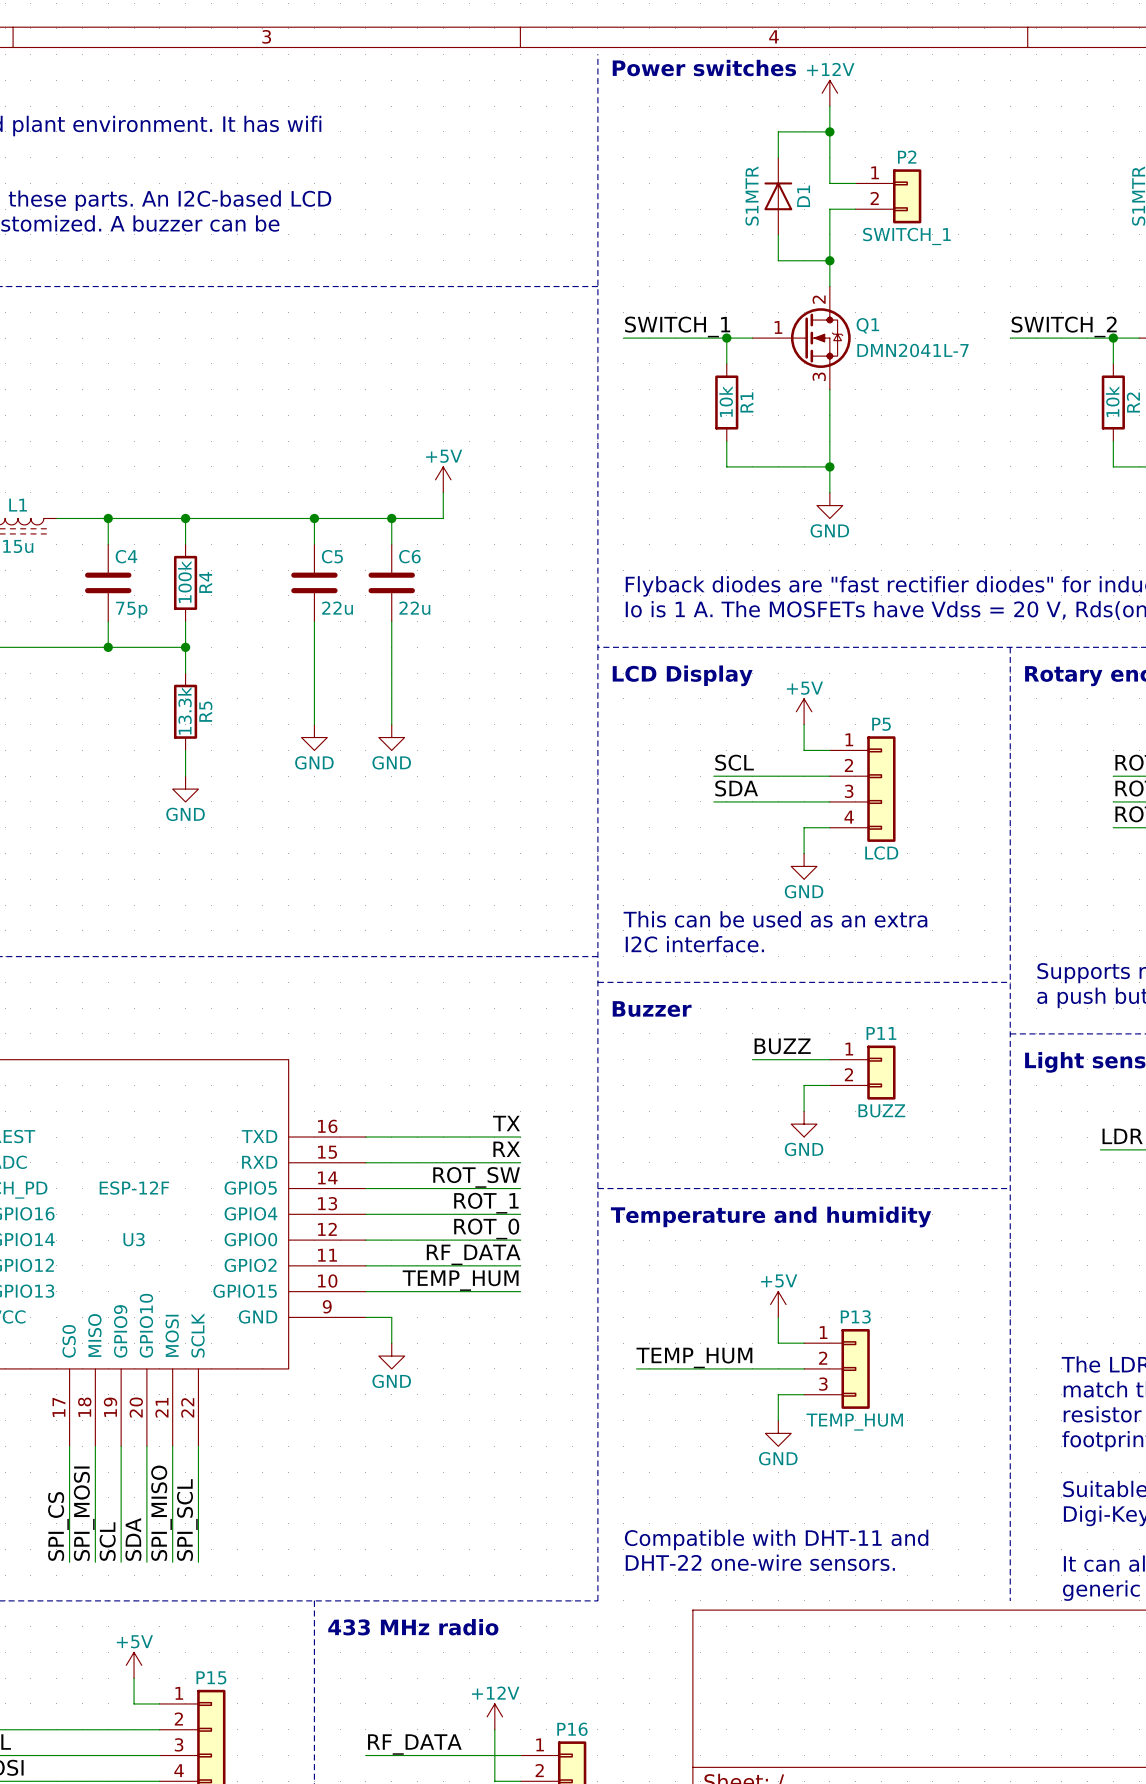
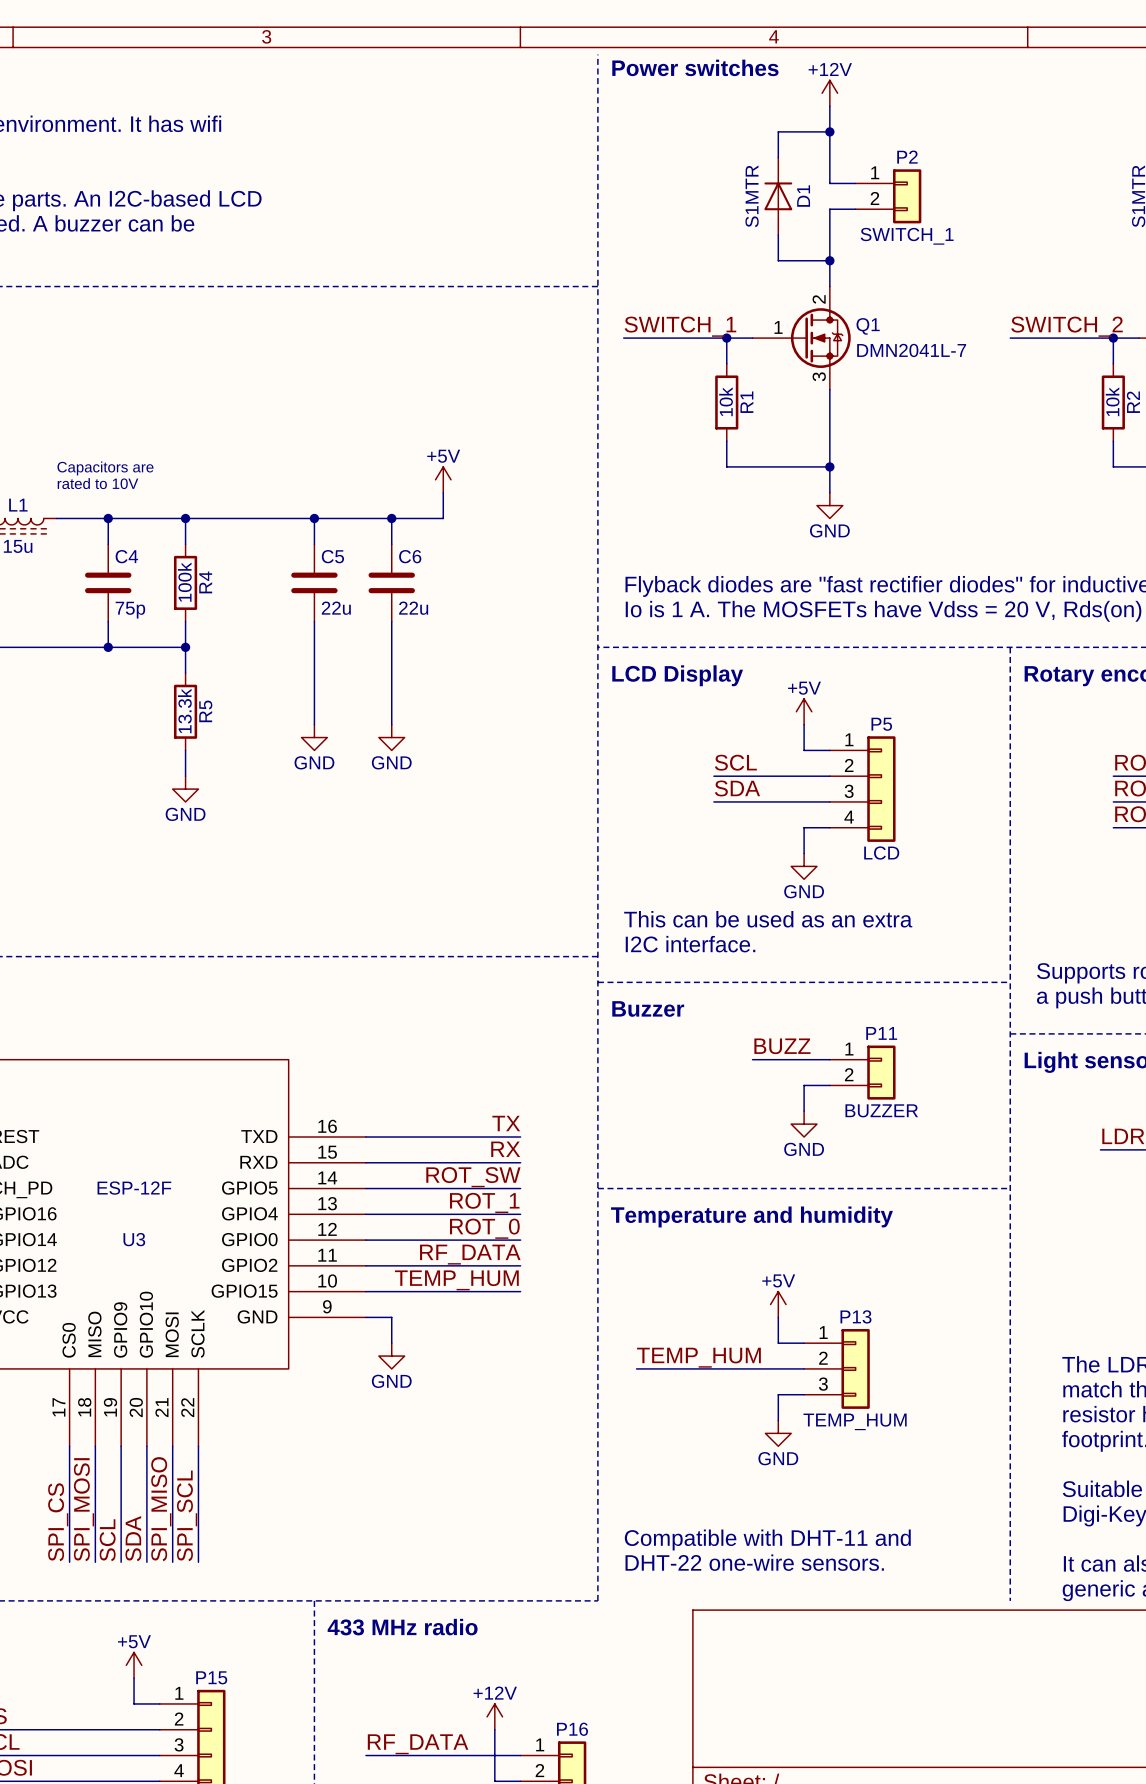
text: none -> Capacitors are (105, 468)
text: none -> rated to 10V (97, 483)
P11 value: BUZZ (881, 1110) -> BUZZER (881, 1110)

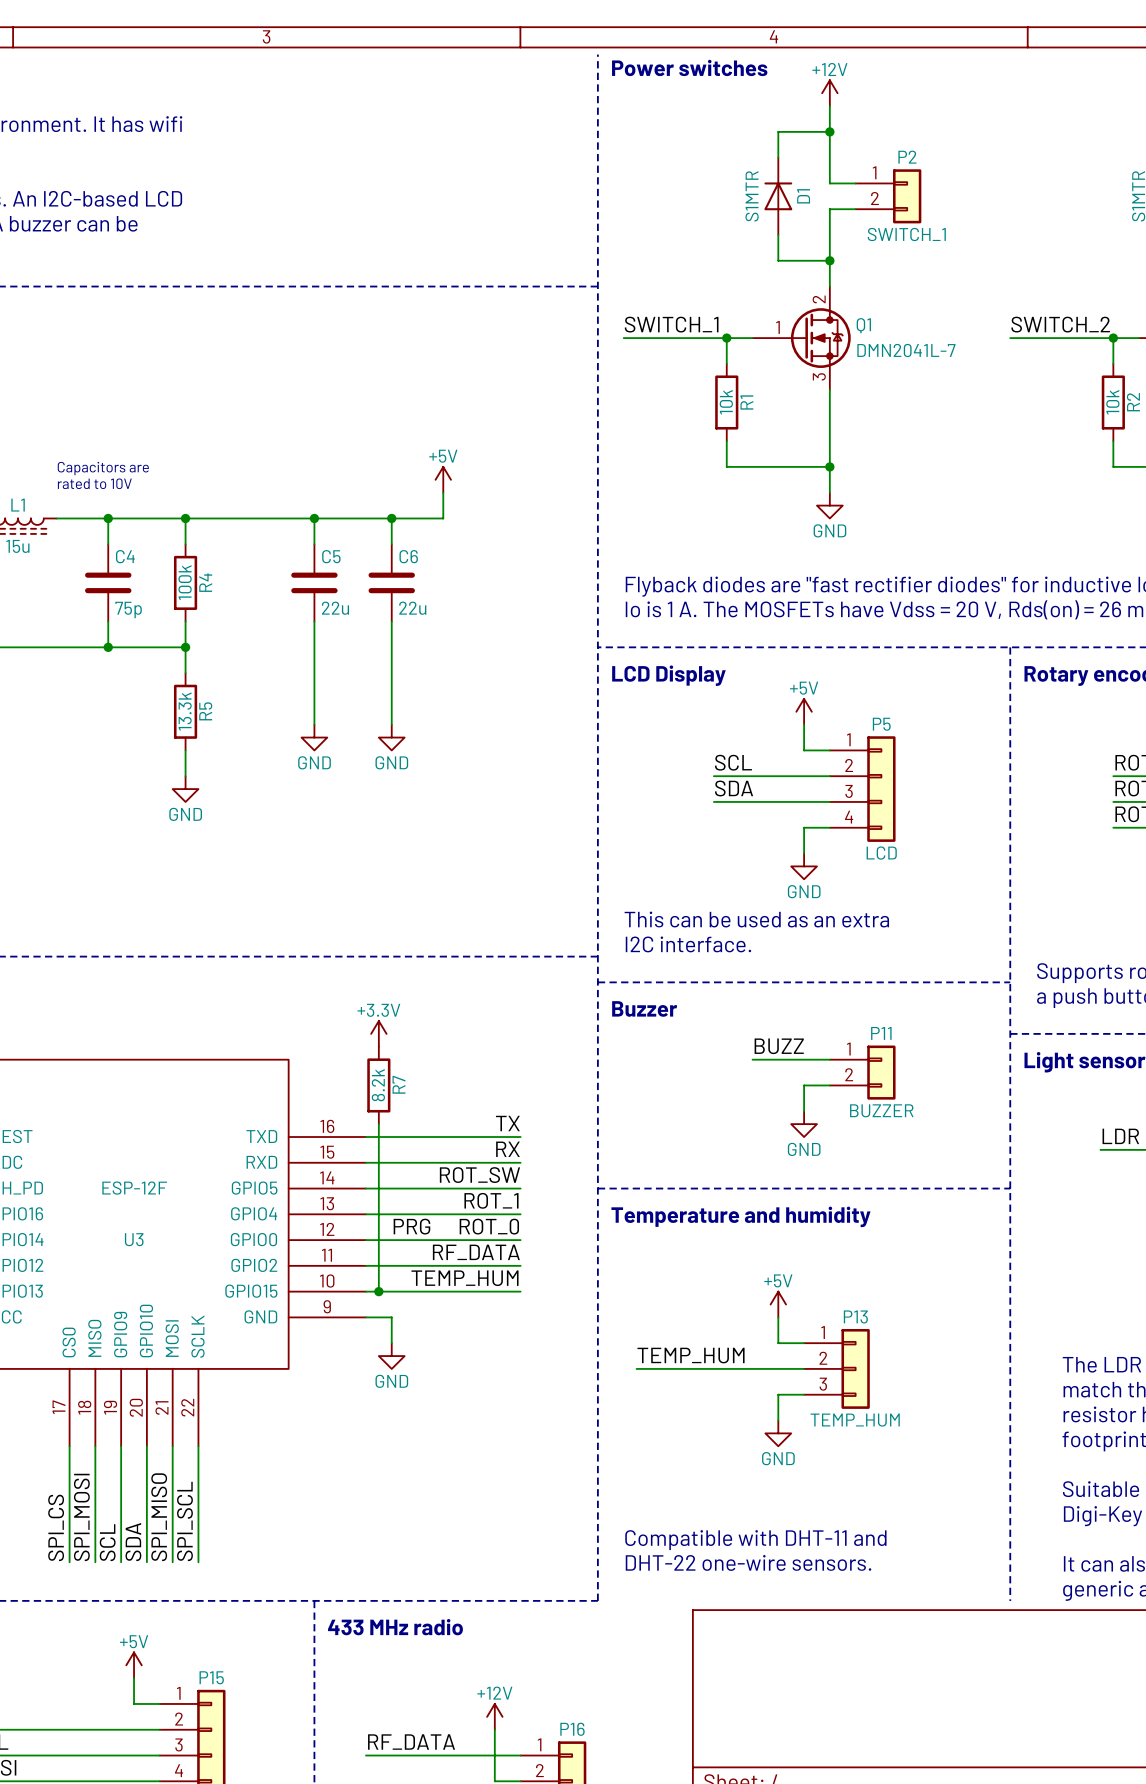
power symbol: none -> +3.3V (378, 1033)
R7: none -> 8.2k (378, 1085)
wire: none -> (378, 1124) (378, 1291)
label: none -> PRG (411, 1226)
junction: none -> (378, 1291)

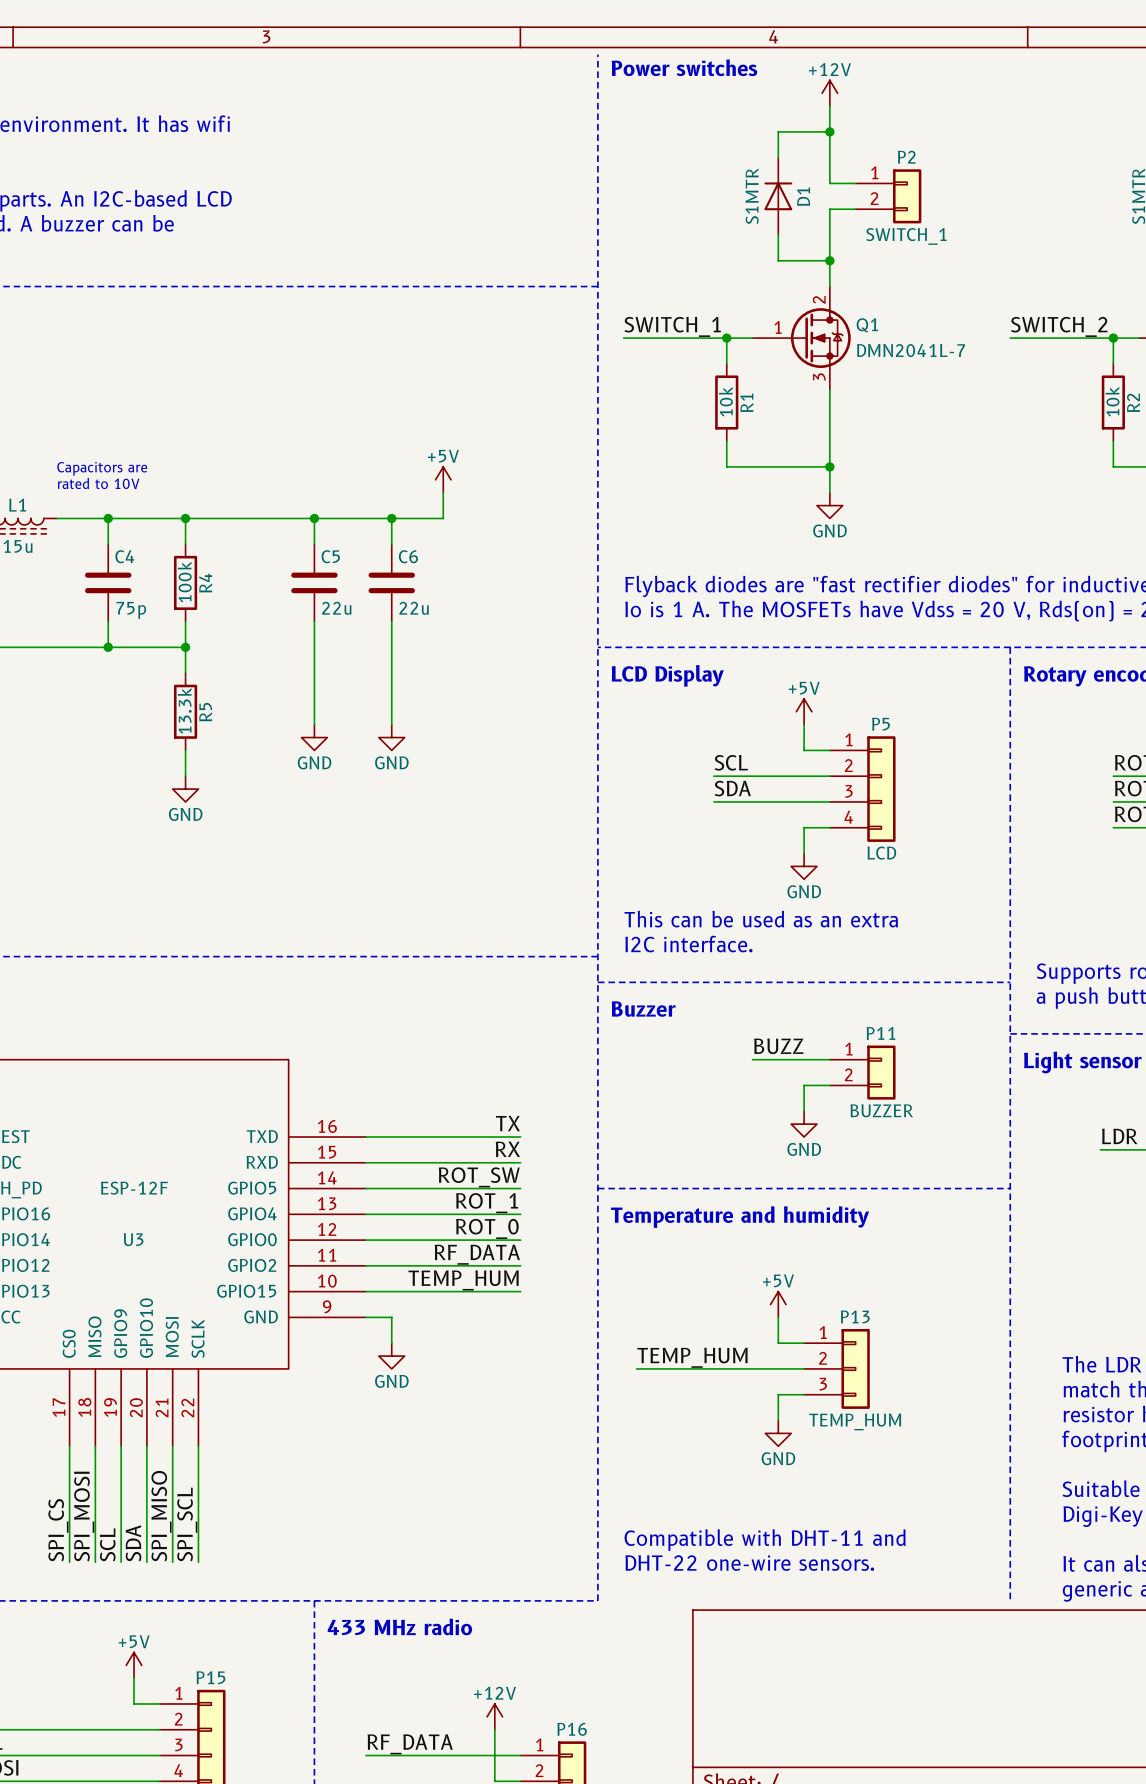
power symbol: +3.3V (378, 1033) -> none
R7: 8.2k (378, 1085) -> none
wire: (378, 1124) (378, 1291) -> none
label: PRG (411, 1226) -> none
junction: (378, 1291) -> none

